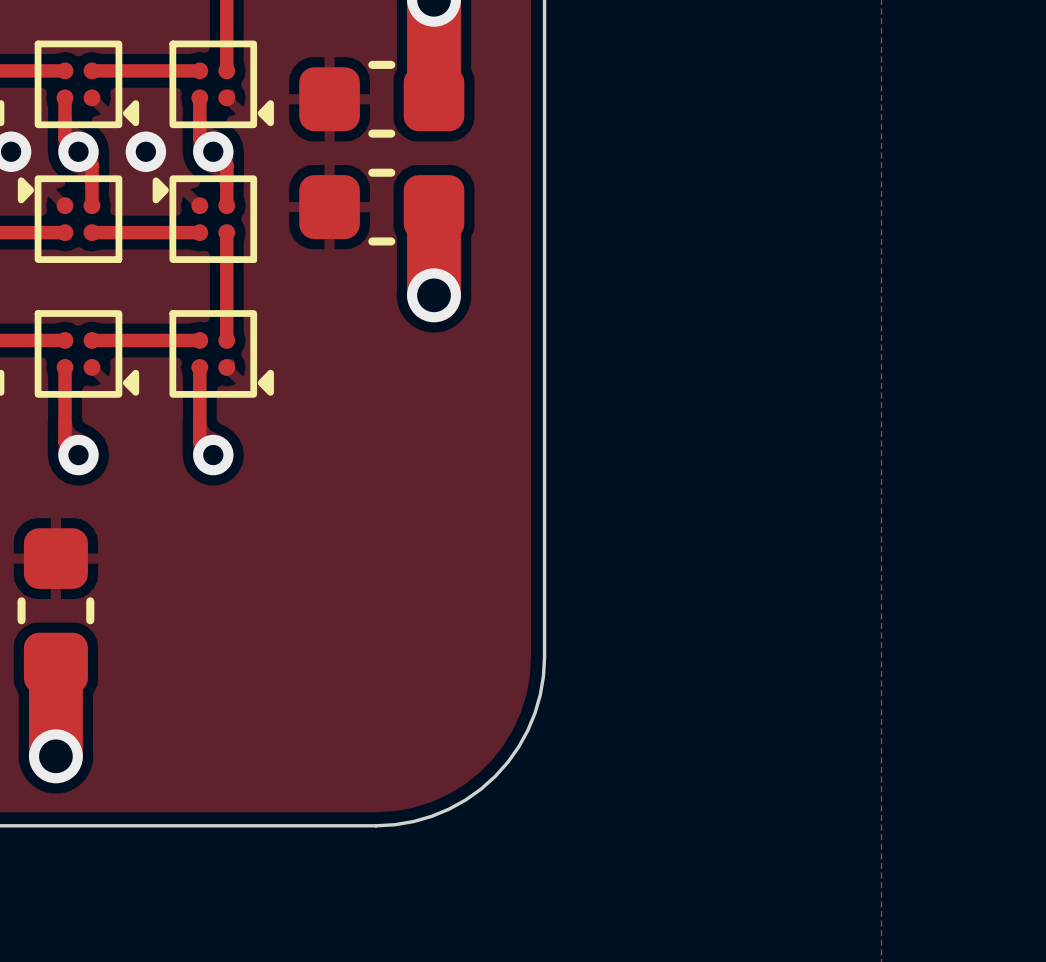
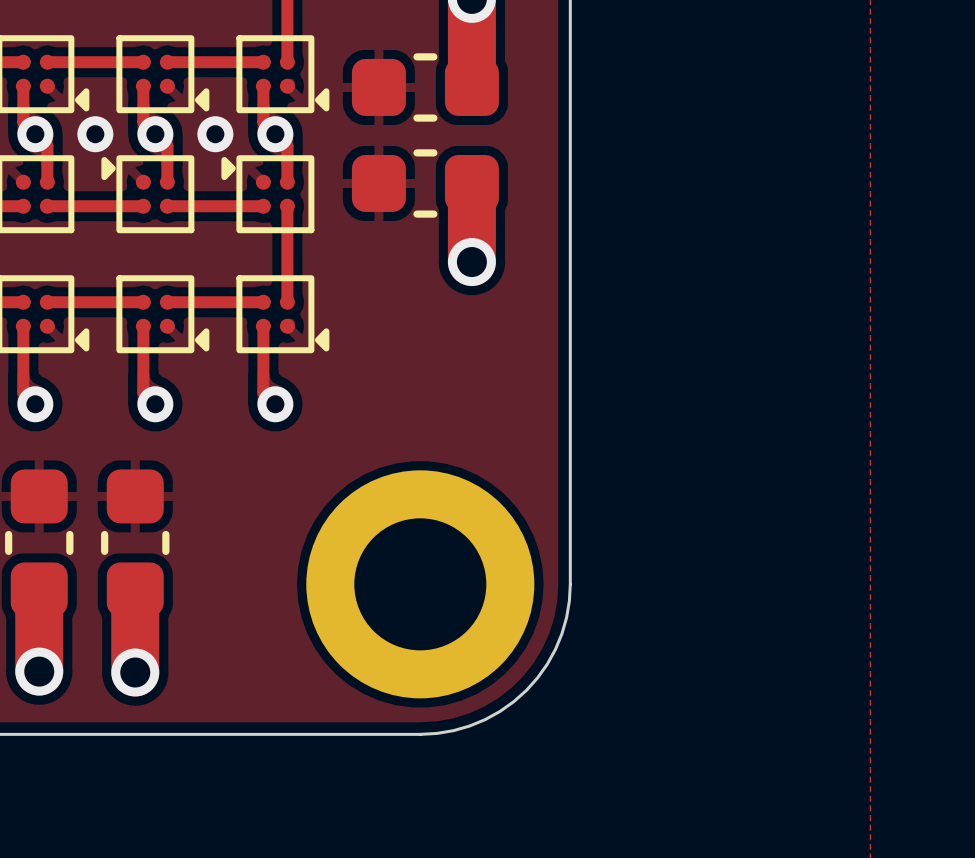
part: none -> (420, 584)

